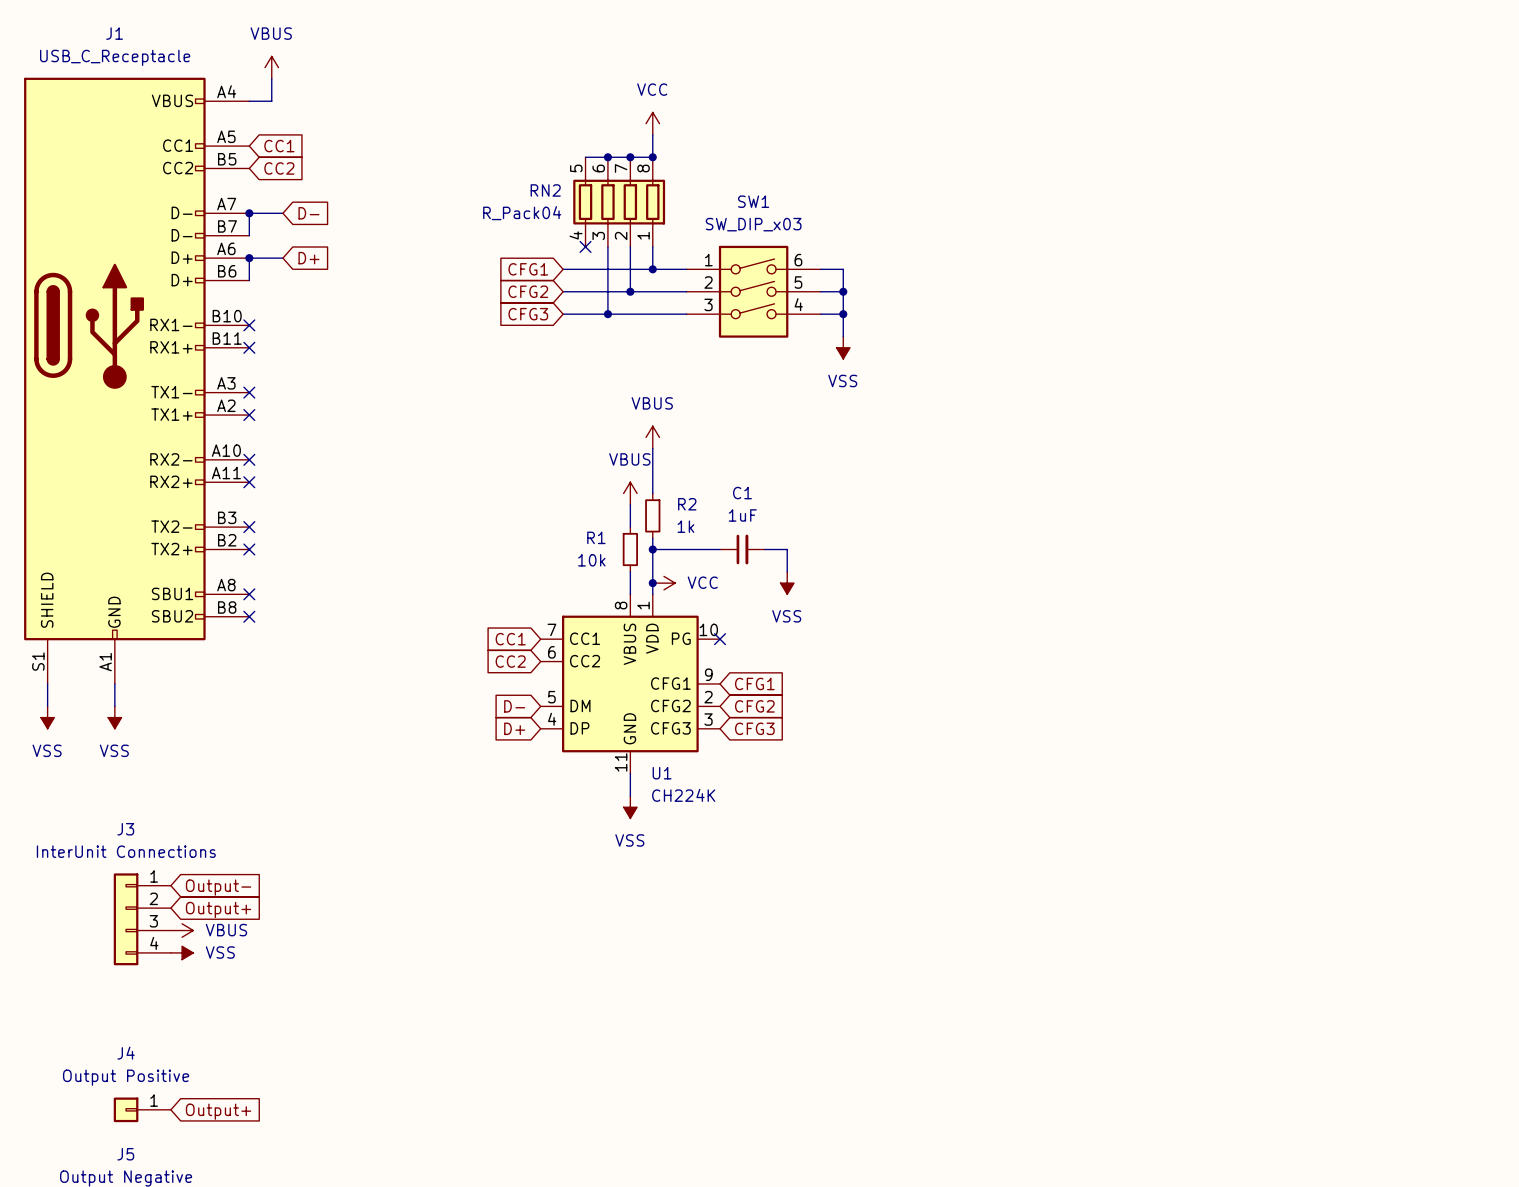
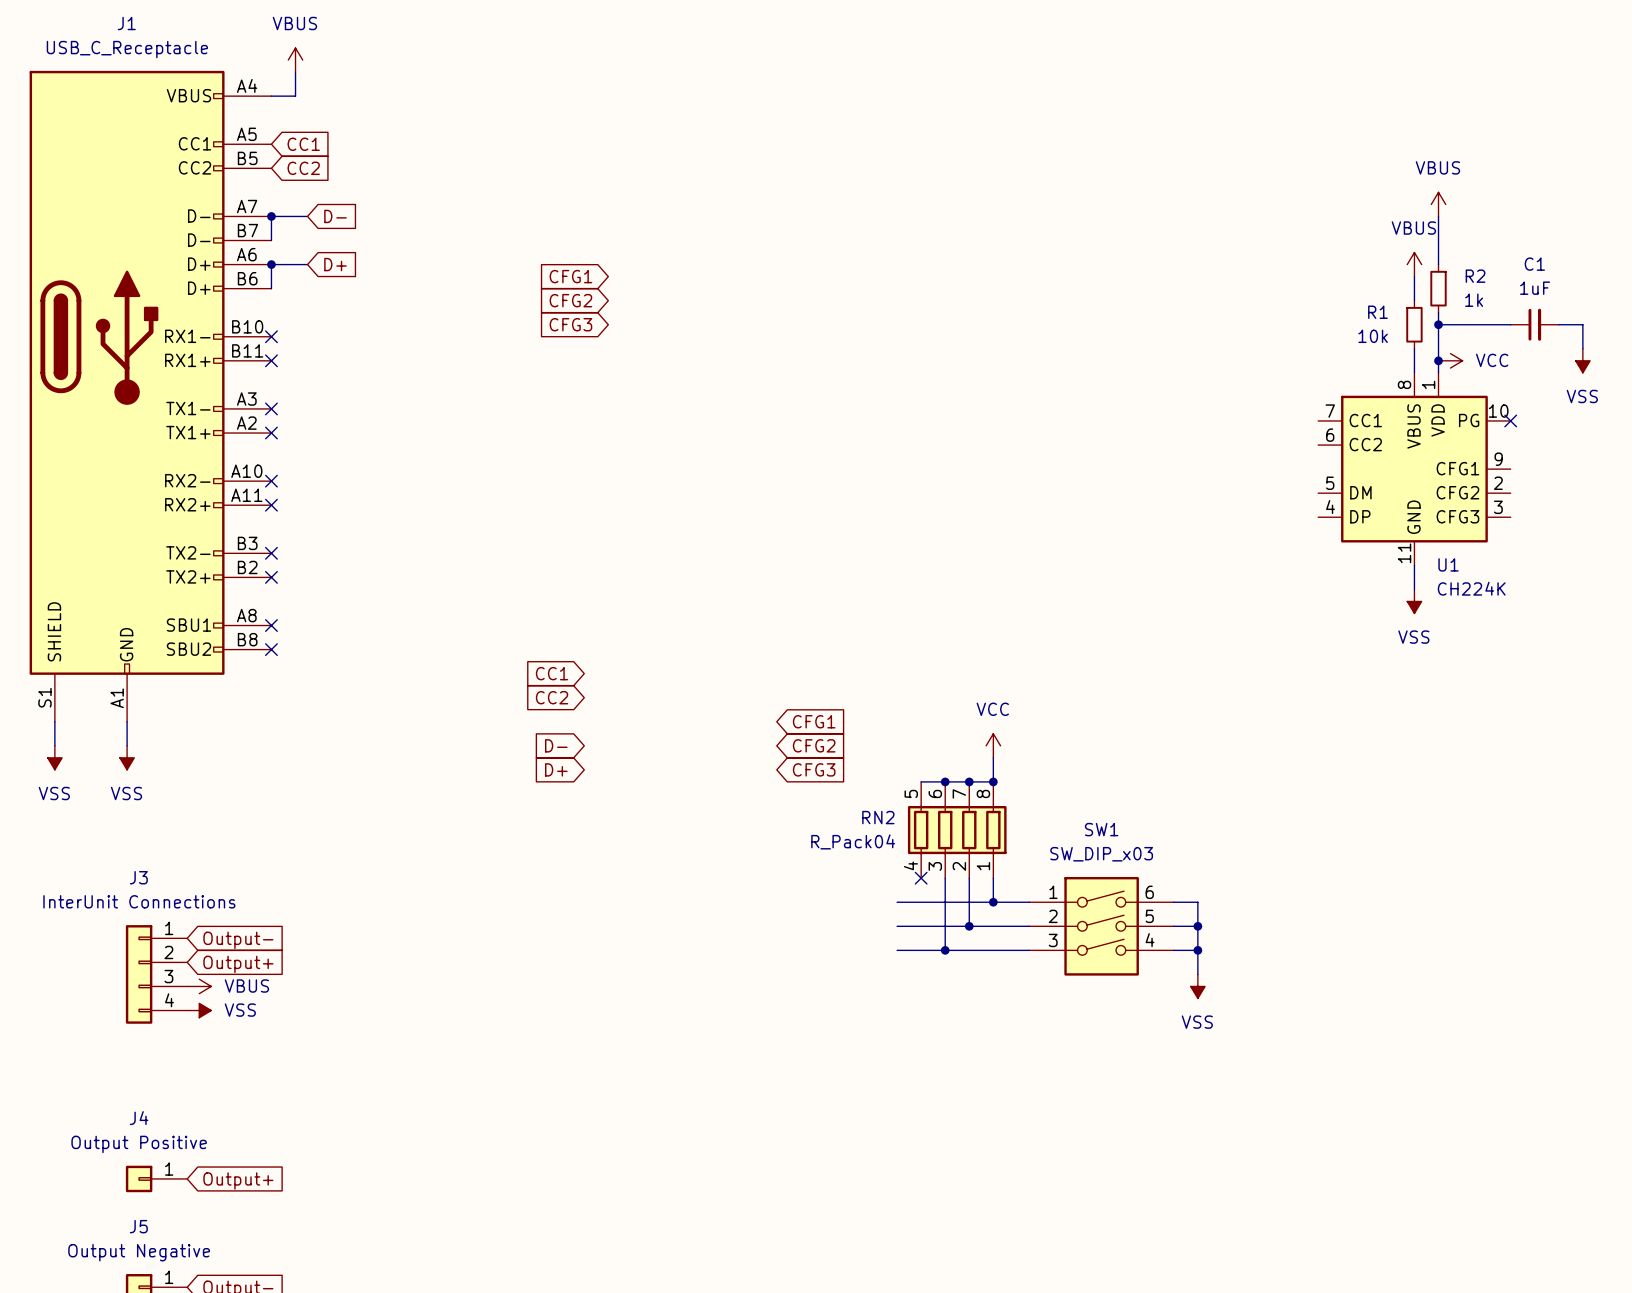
power symbol: VCC (652, 123) -> none
wire: (652, 134) (652, 157) (585, 157) -> none
junction: (607, 157) -> none
junction: (630, 157) -> none
junction: (652, 157) -> none
RN2 position: (619, 202) -> (957, 830)
power symbol: none -> VBUS (1438, 204)
wire: none -> (1438, 216) (1438, 264)
no-connect mark: (585, 246) -> none
wire: (607, 246) (607, 314) -> none
wire: (630, 246) (630, 291) -> none
wire: (652, 246) (652, 269) -> none
power symbol: none -> VBUS (1414, 264)
wire: (563, 269) (686, 269) -> none
junction: (652, 269) -> none
wire: (820, 269) (843, 269) (843, 336) -> none
wire: none -> (1414, 276) (1414, 300)
wire: (563, 291) (686, 291) -> none
junction: (630, 291) -> none
SW1 position: (753, 291) -> (1101, 926)
wire: (820, 291) (843, 291) -> none
junction: (843, 291) -> none
wire: none -> (1438, 312) (1438, 372)
wire: (563, 314) (686, 314) -> none
junction: (607, 314) -> none
wire: (820, 314) (843, 314) -> none
junction: (843, 314) -> none
wire: none -> (1438, 324) (1510, 324)
junction: none -> (1438, 324)
wire: none -> (1558, 324) (1582, 324) (1582, 348)
wire: none -> (1414, 348) (1414, 372)
power symbol: VSS (843, 347) -> none
junction: none -> (1438, 360)
power symbol: none -> VCC (1450, 360)
power symbol: none -> VSS (1582, 360)
no-connect mark: none -> (1510, 420)
power symbol: VBUS (652, 437) -> none
wire: (652, 448) (652, 493) -> none
power symbol: VBUS (630, 493) -> none
wire: (630, 504) (630, 527) -> none
R2 position: (652, 515) -> (1438, 288)
wire: (652, 538) (652, 594) -> none
wire: none -> (1414, 565) (1414, 589)
R1 position: (630, 549) -> (1414, 324)
wire: (652, 549) (720, 549) -> none
junction: (652, 549) -> none
C1 position: (742, 549) -> (1534, 324)
wire: (764, 549) (787, 549) (787, 571) -> none
wire: (630, 571) (630, 594) -> none
power symbol: none -> VSS (1414, 601)
junction: (652, 583) -> none
power symbol: VCC (663, 583) -> none
power symbol: VSS (787, 583) -> none
no-connect mark: (720, 639) -> none
U1 position: (630, 683) -> (1414, 469)
power symbol: none -> VCC (993, 745)
wire: none -> (993, 757) (993, 781) (921, 781)
junction: none -> (945, 781)
junction: none -> (969, 781)
junction: none -> (993, 781)
wire: (630, 773) (630, 796) -> none
power symbol: VSS (630, 807) -> none
no-connect mark: none -> (921, 878)
wire: none -> (945, 878) (945, 950)
wire: none -> (969, 878) (969, 926)
wire: none -> (993, 878) (993, 902)
wire: none -> (897, 902) (1029, 902)
junction: none -> (993, 902)
wire: none -> (1173, 902) (1197, 902) (1197, 974)
wire: none -> (897, 926) (1029, 926)
junction: none -> (969, 926)
wire: none -> (1173, 926) (1197, 926)
junction: none -> (1197, 926)
wire: none -> (897, 950) (1029, 950)
junction: none -> (945, 950)
wire: none -> (1173, 950) (1197, 950)
junction: none -> (1197, 950)
power symbol: none -> VSS (1197, 986)

